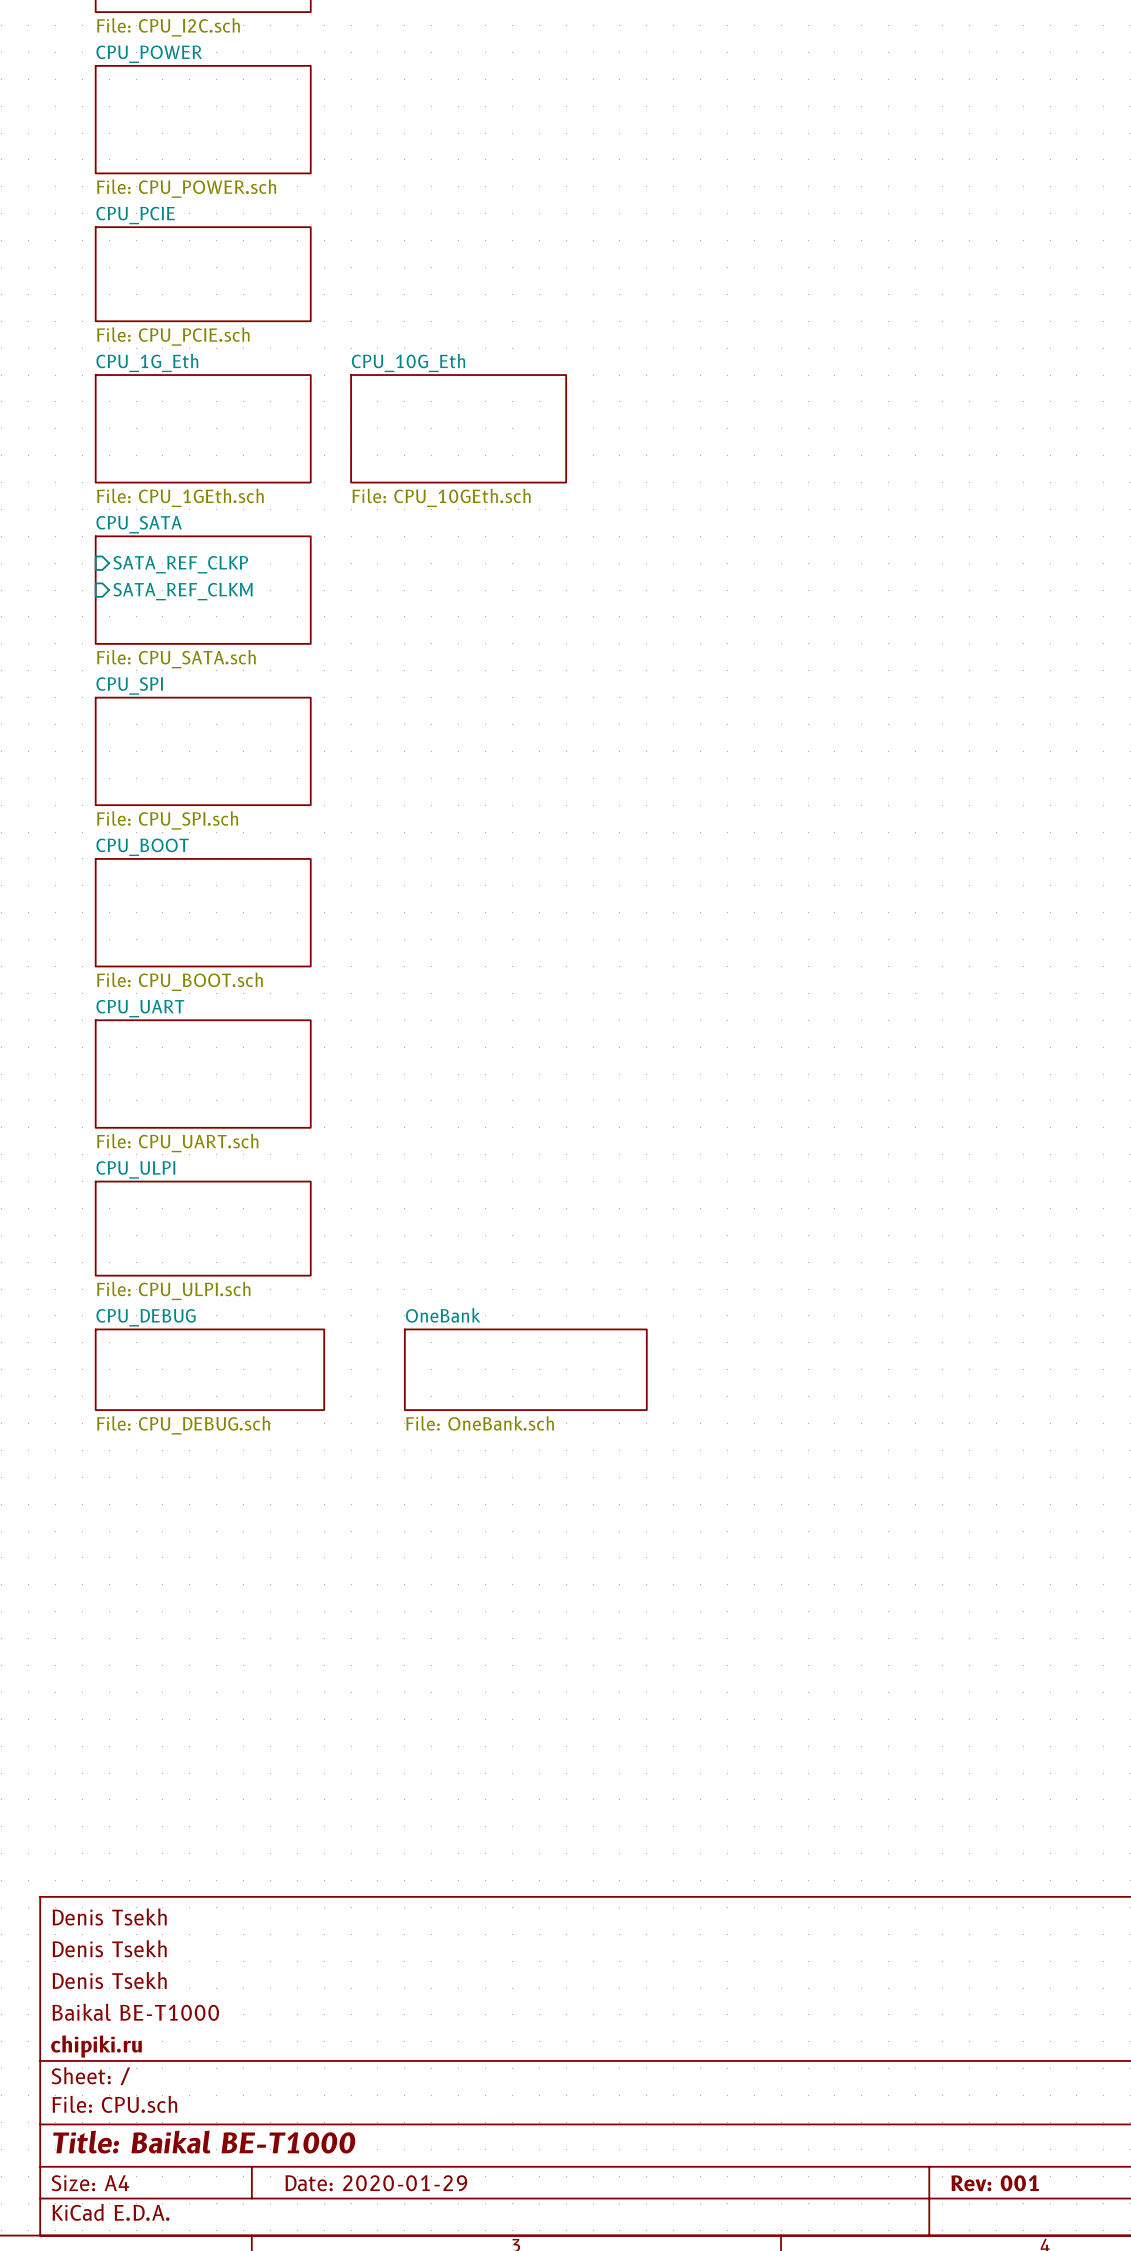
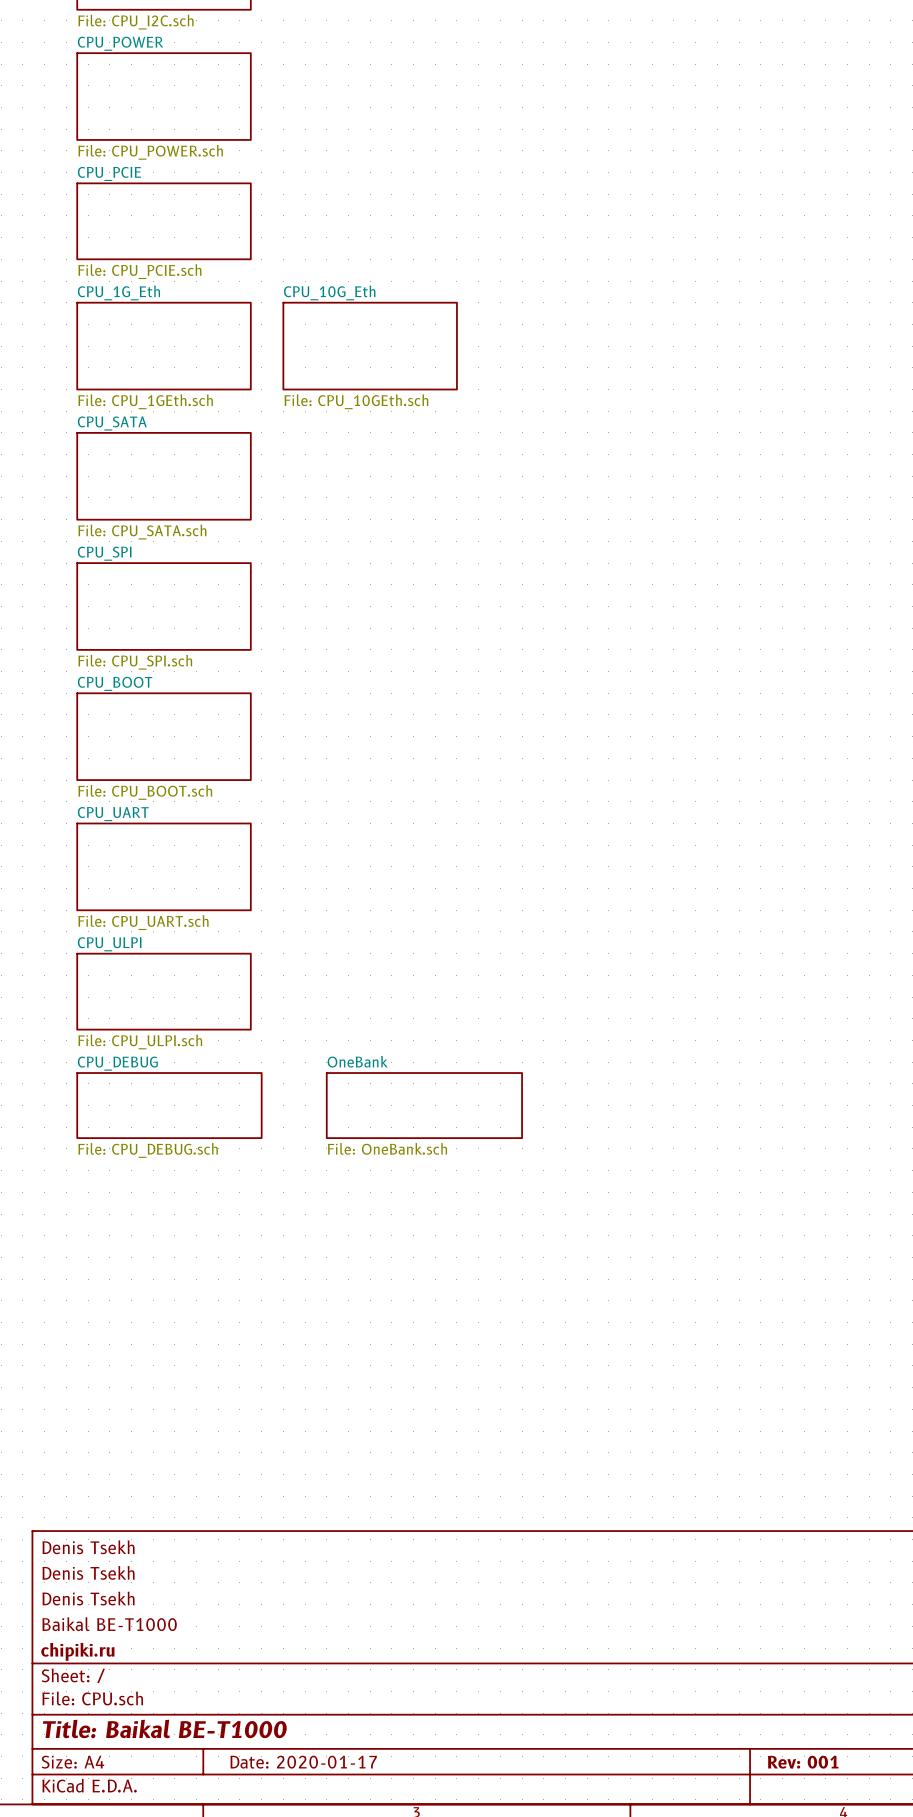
sheet pin: SATA_REF_CLKP (180, 564) -> none
sheet pin: SATA_REF_CLKM (183, 591) -> none
title block: Date: 2020-01-29 (376, 2183) -> Date: 2020-01-17 (303, 1762)

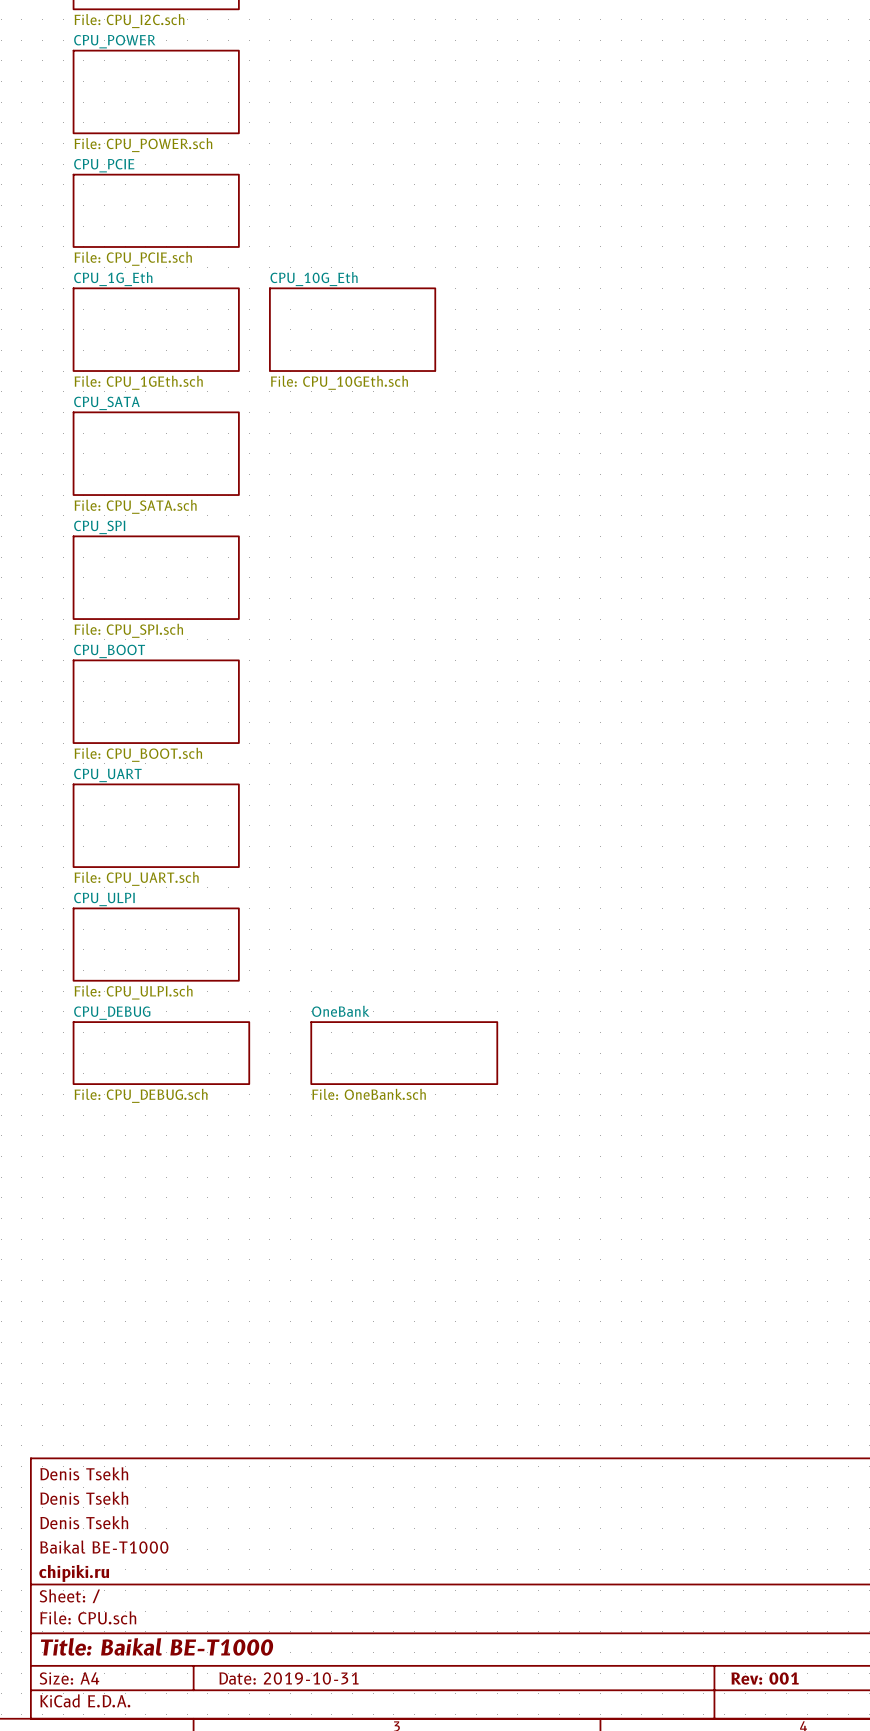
title block: Date: 2020-01-17 (303, 1762) -> Date: 2019-10-31 (289, 1678)

